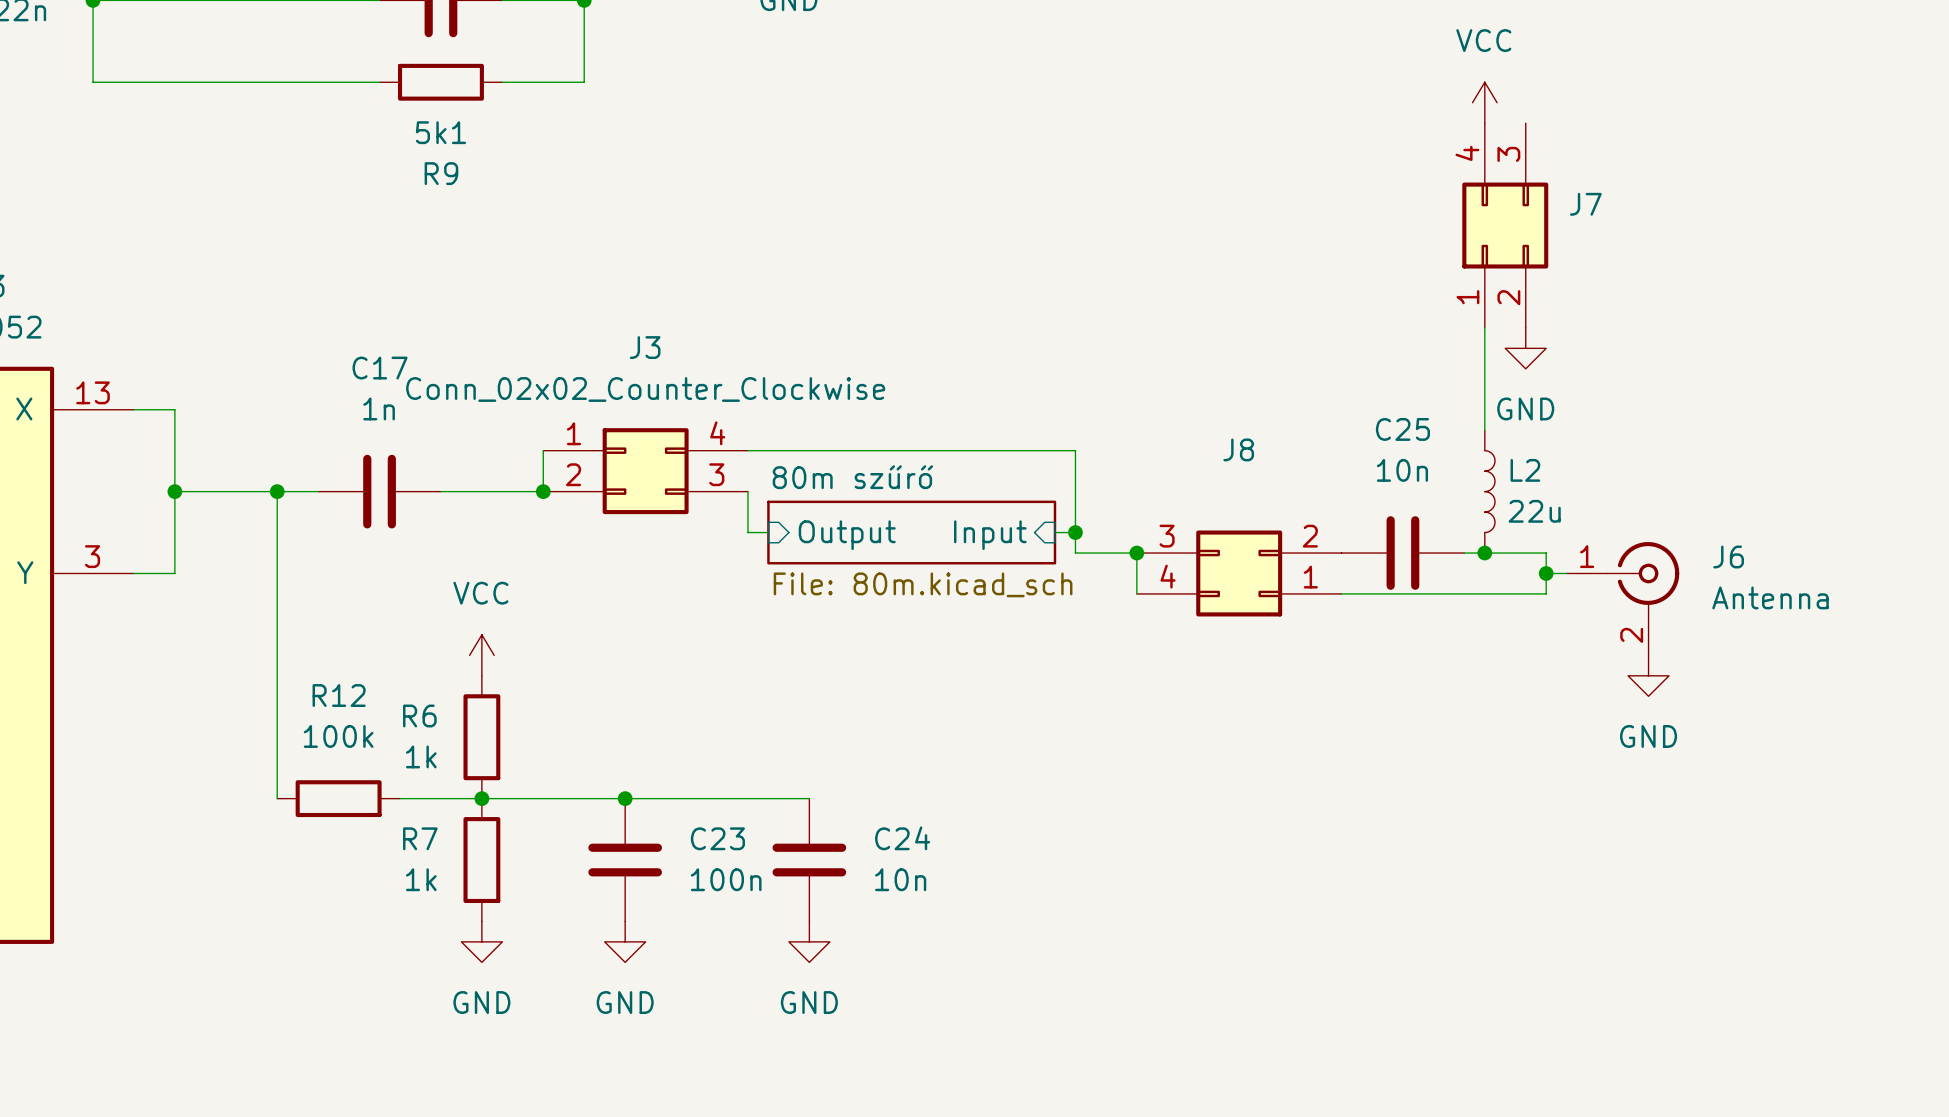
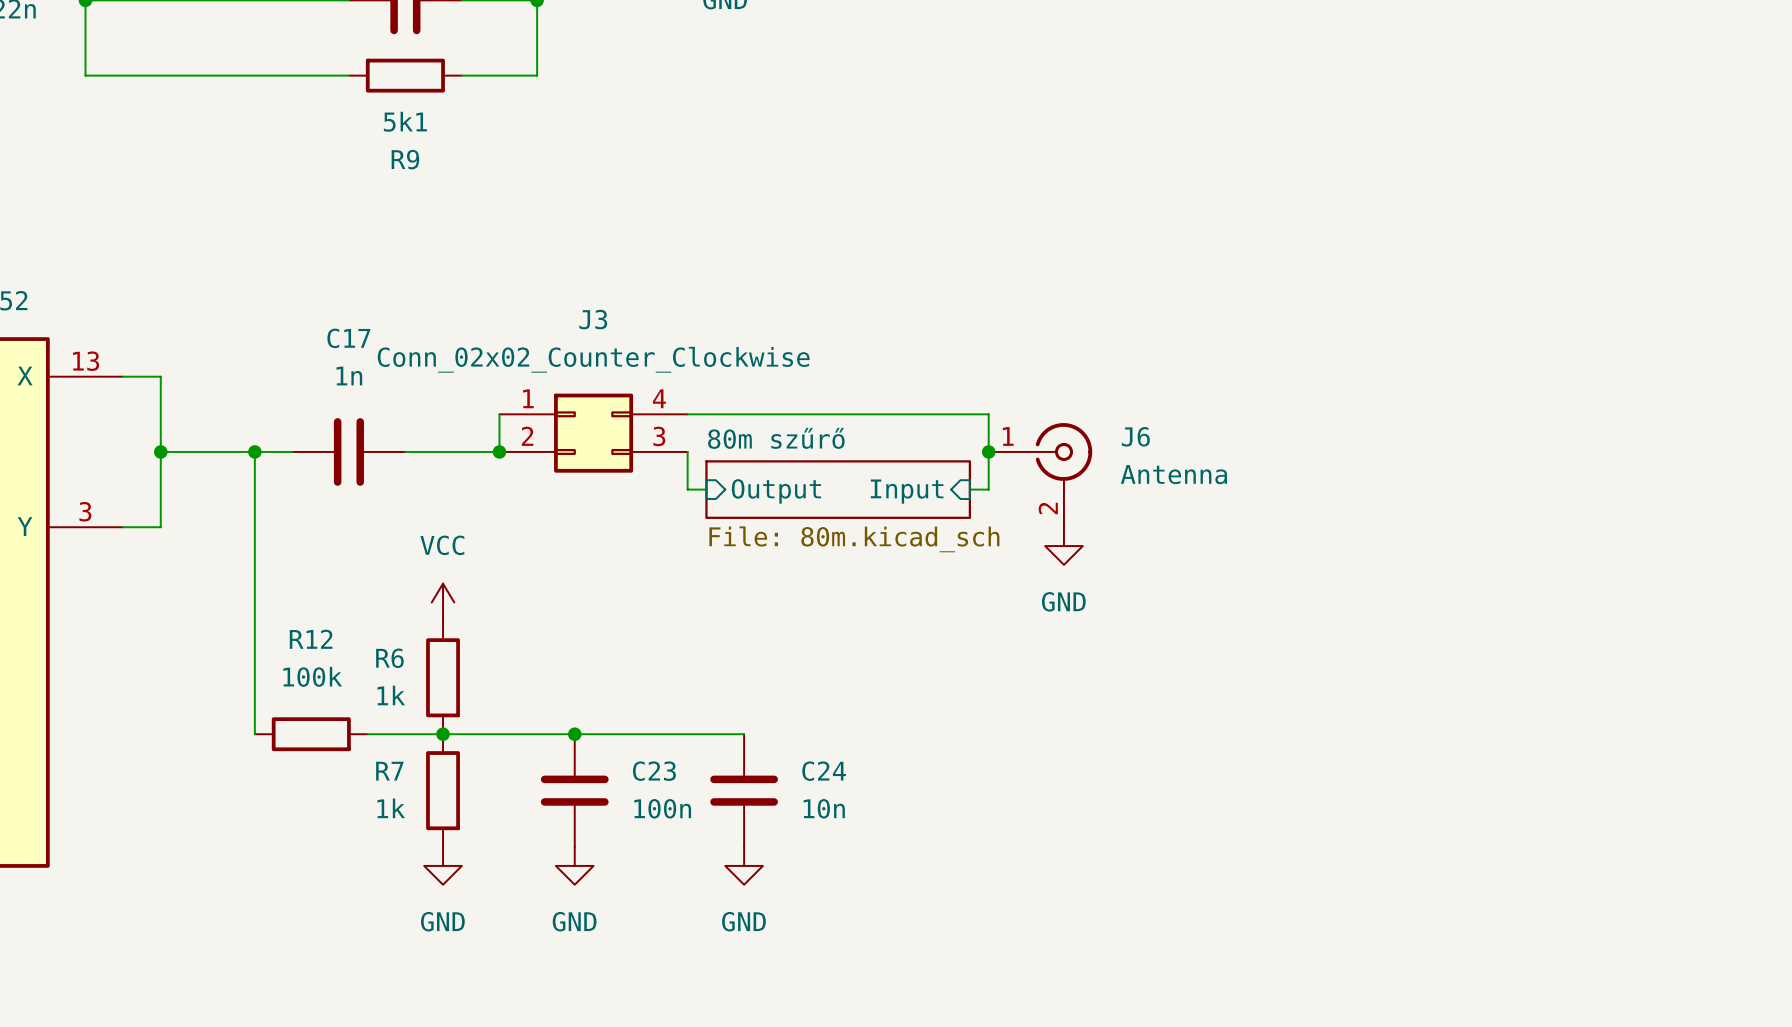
power symbol: VCC (1484, 102) -> none
J7: (1505, 225) -> none
wire: (1484, 327) (1484, 430) -> none
power symbol: GND (1525, 348) -> none
L2: 22u (1489, 491) -> none
wire: (1075, 532) (1075, 553) (1136, 553) (1136, 593) -> none
junction position: (1075, 532) -> (988, 451)
junction: (1136, 553) -> none
C25: 10n (1402, 553) -> none
wire: (1464, 553) (1546, 553) (1546, 593) (1341, 593) -> none
junction: (1484, 553) -> none
J8: (1239, 573) -> none
wire: (1546, 573) (1566, 573) -> none
junction: (1546, 573) -> none
power symbol: none -> GND (1063, 546)
J6 position: (1622, 598) -> (1040, 475)
power symbol: GND (1648, 675) -> none

